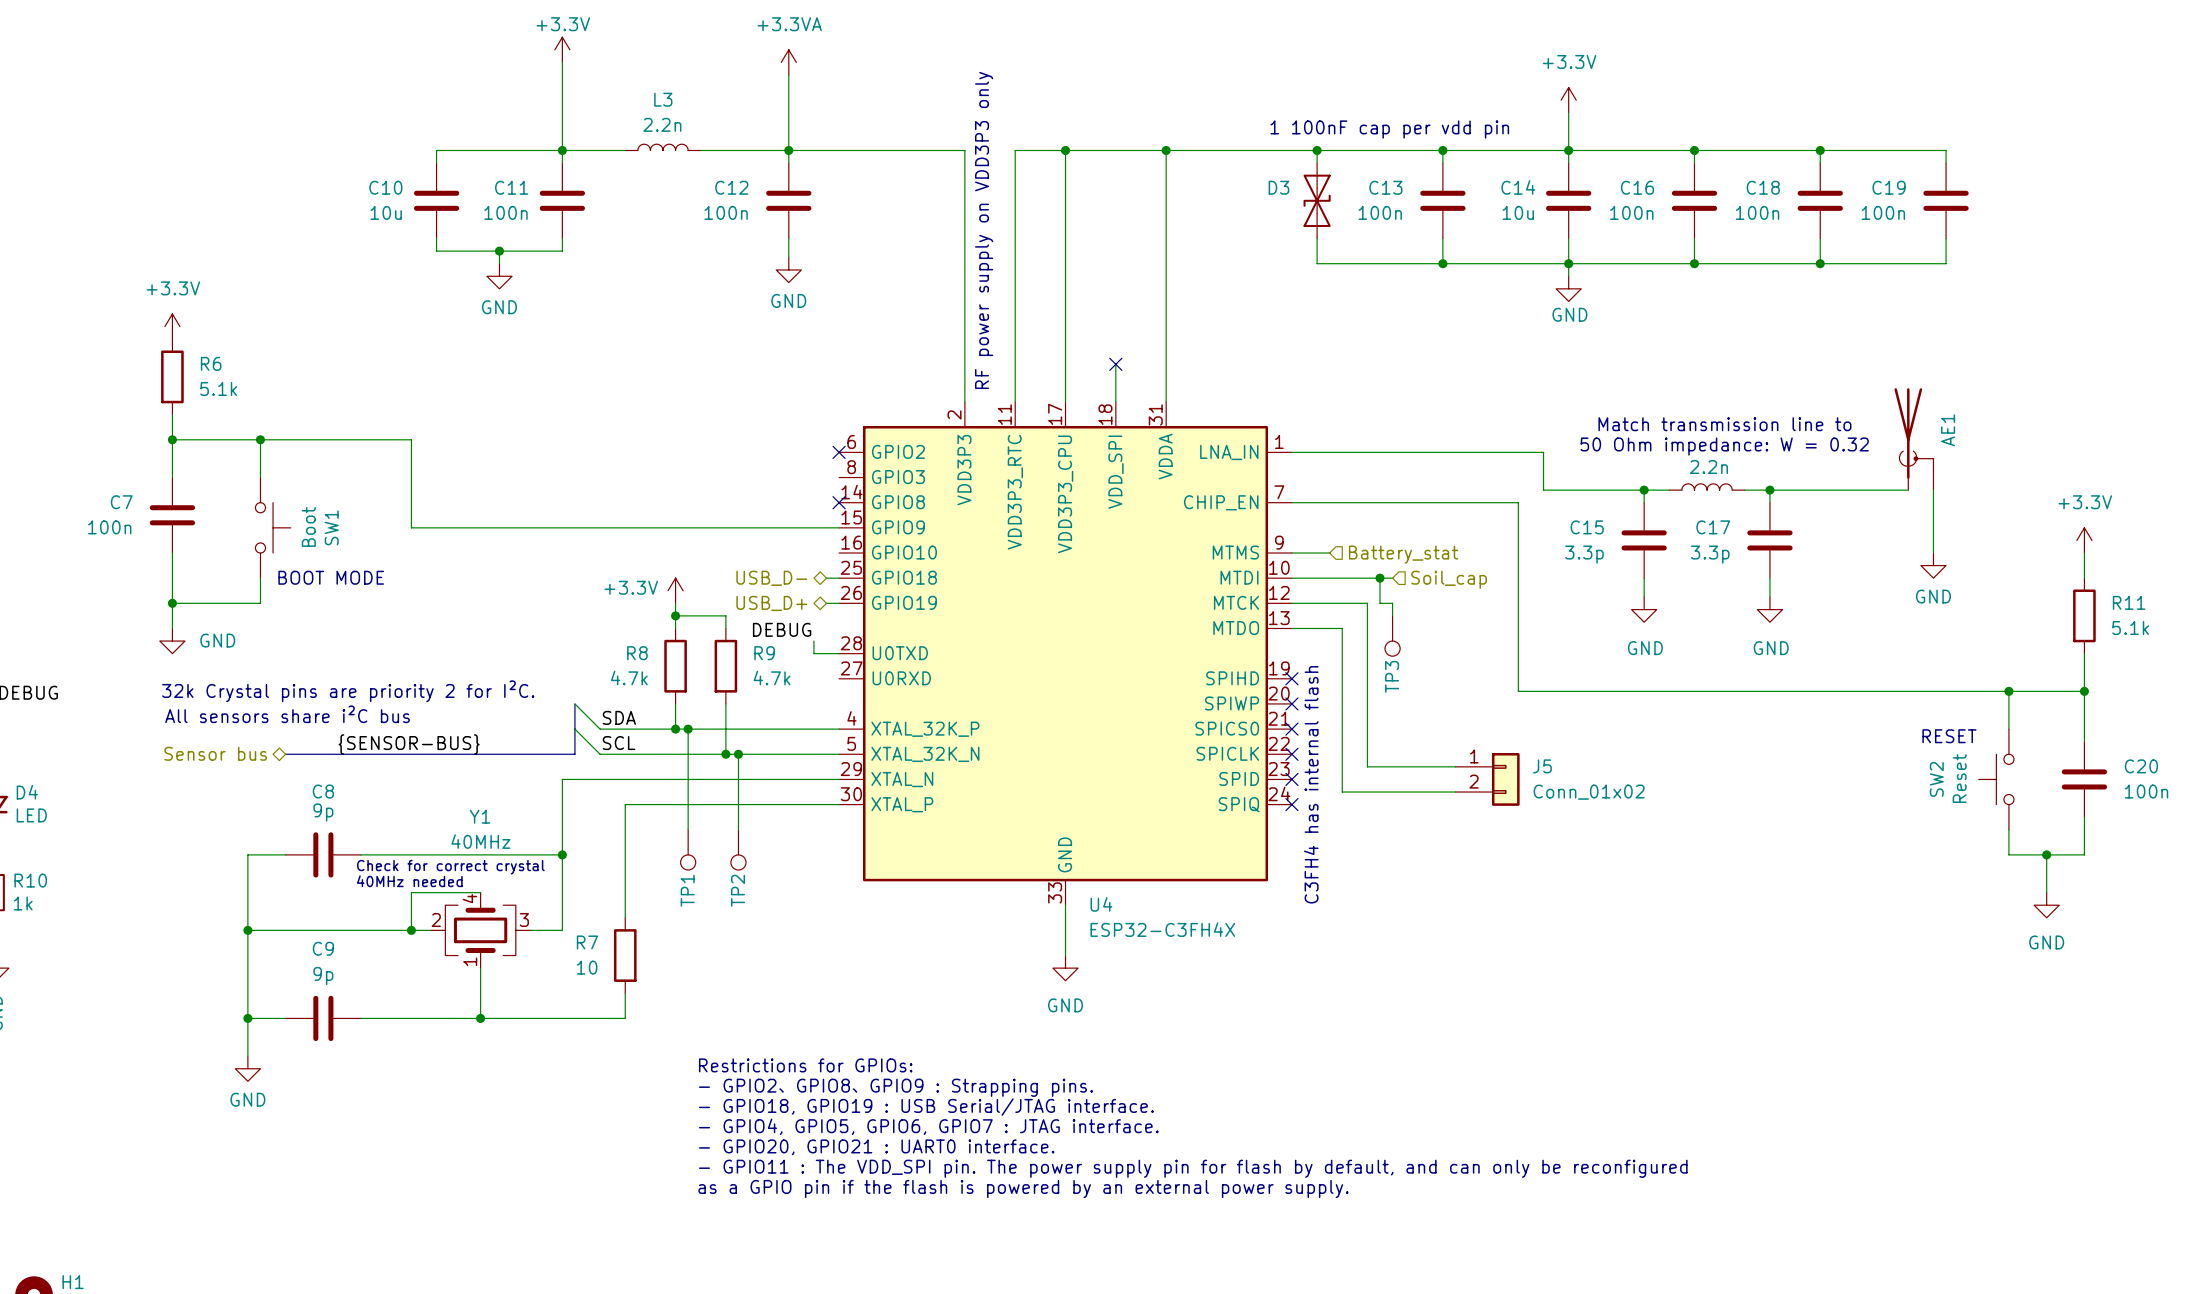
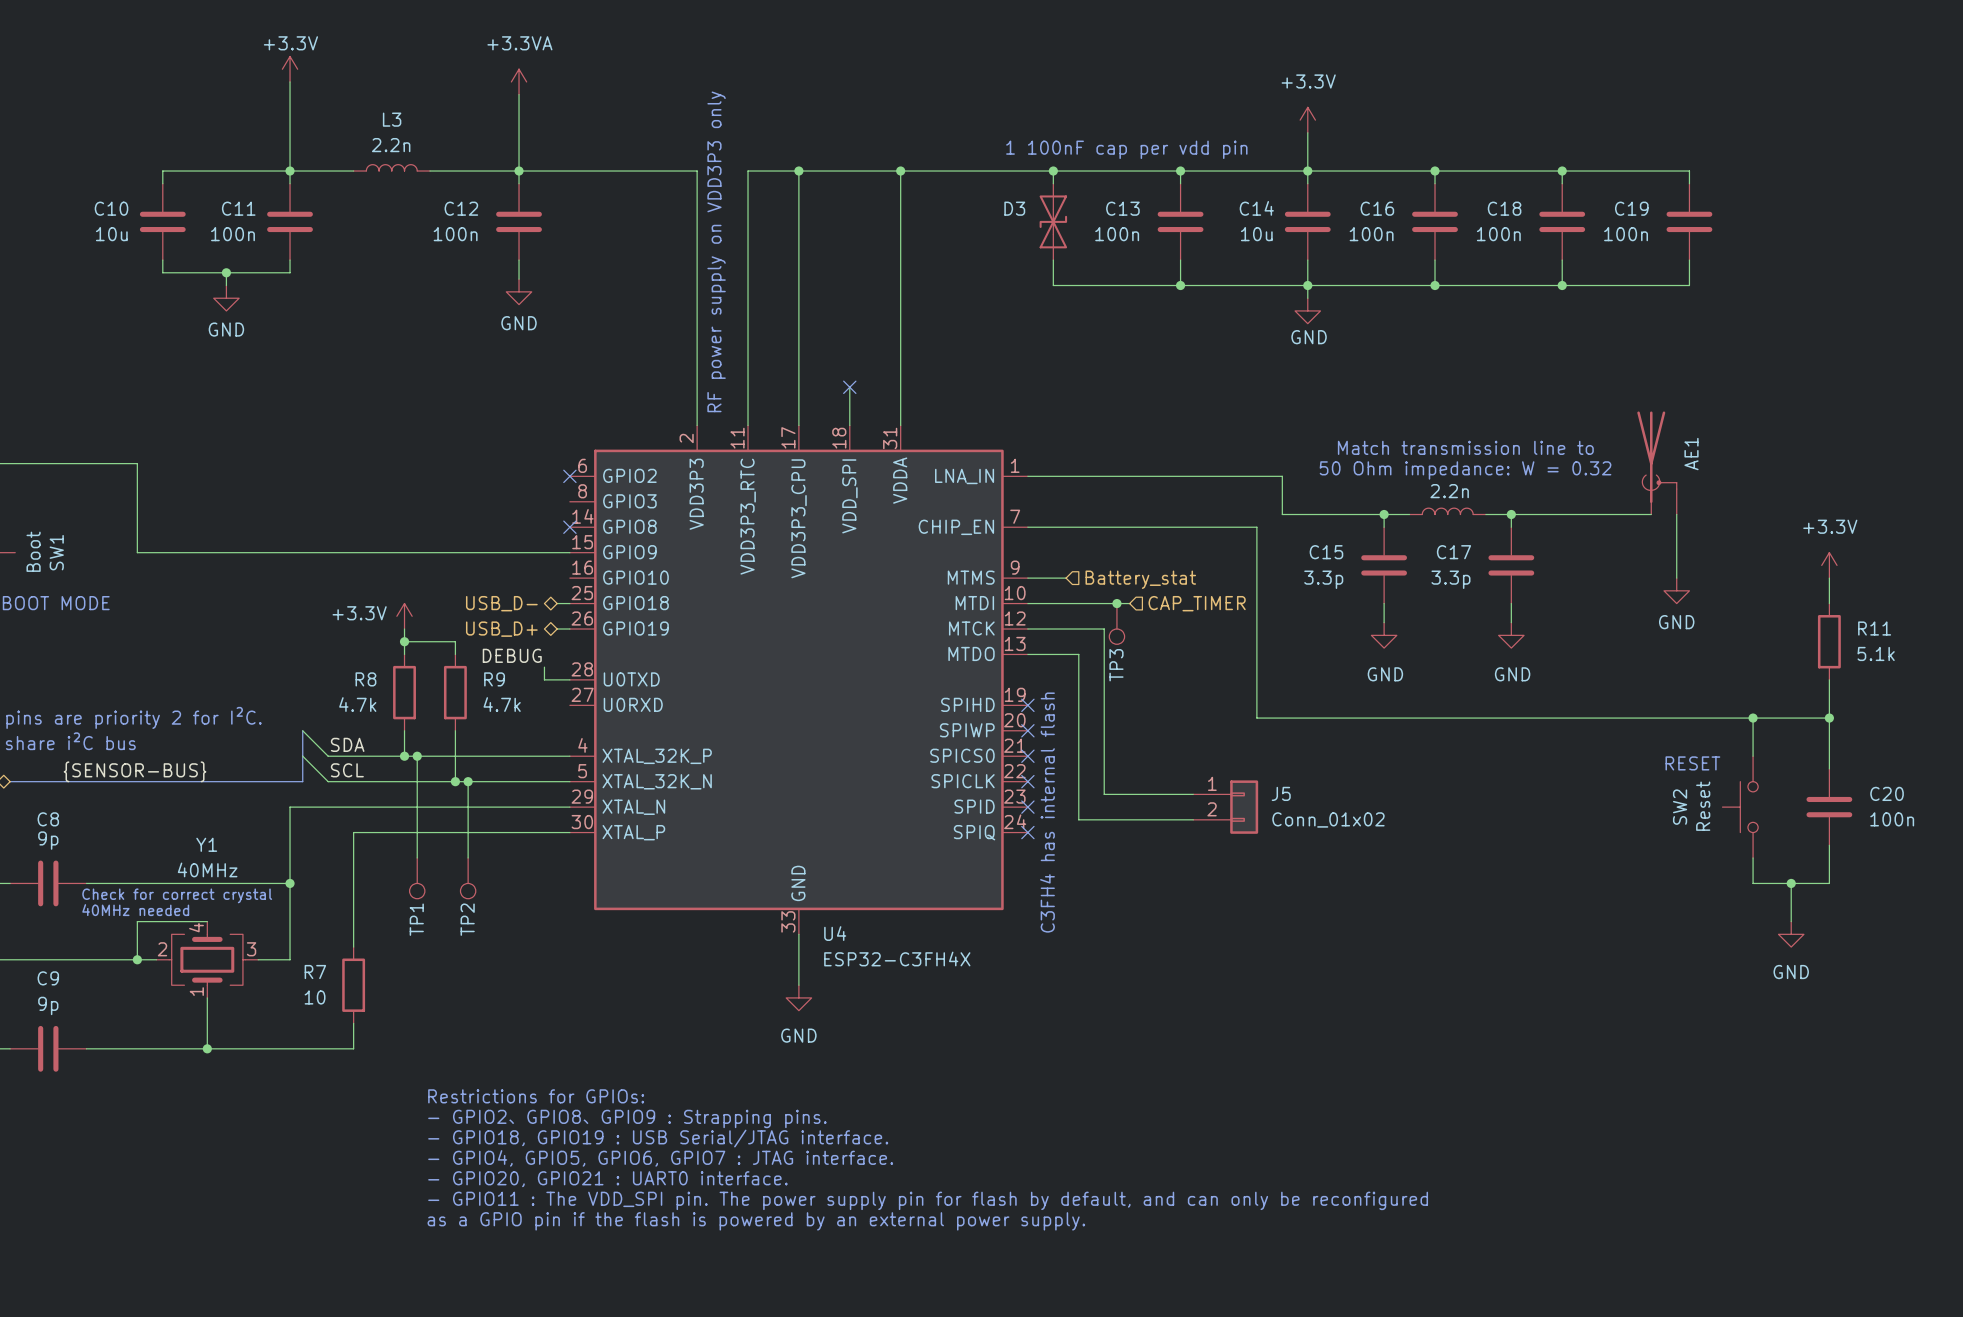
wire: (1379, 578) (1379, 603) (1392, 603) (1392, 615) -> none
hierarchical label: Soil_cap (1449, 579) -> CAP_TIMER (1197, 603)
TP3 position: (1392, 636) -> (1116, 623)

